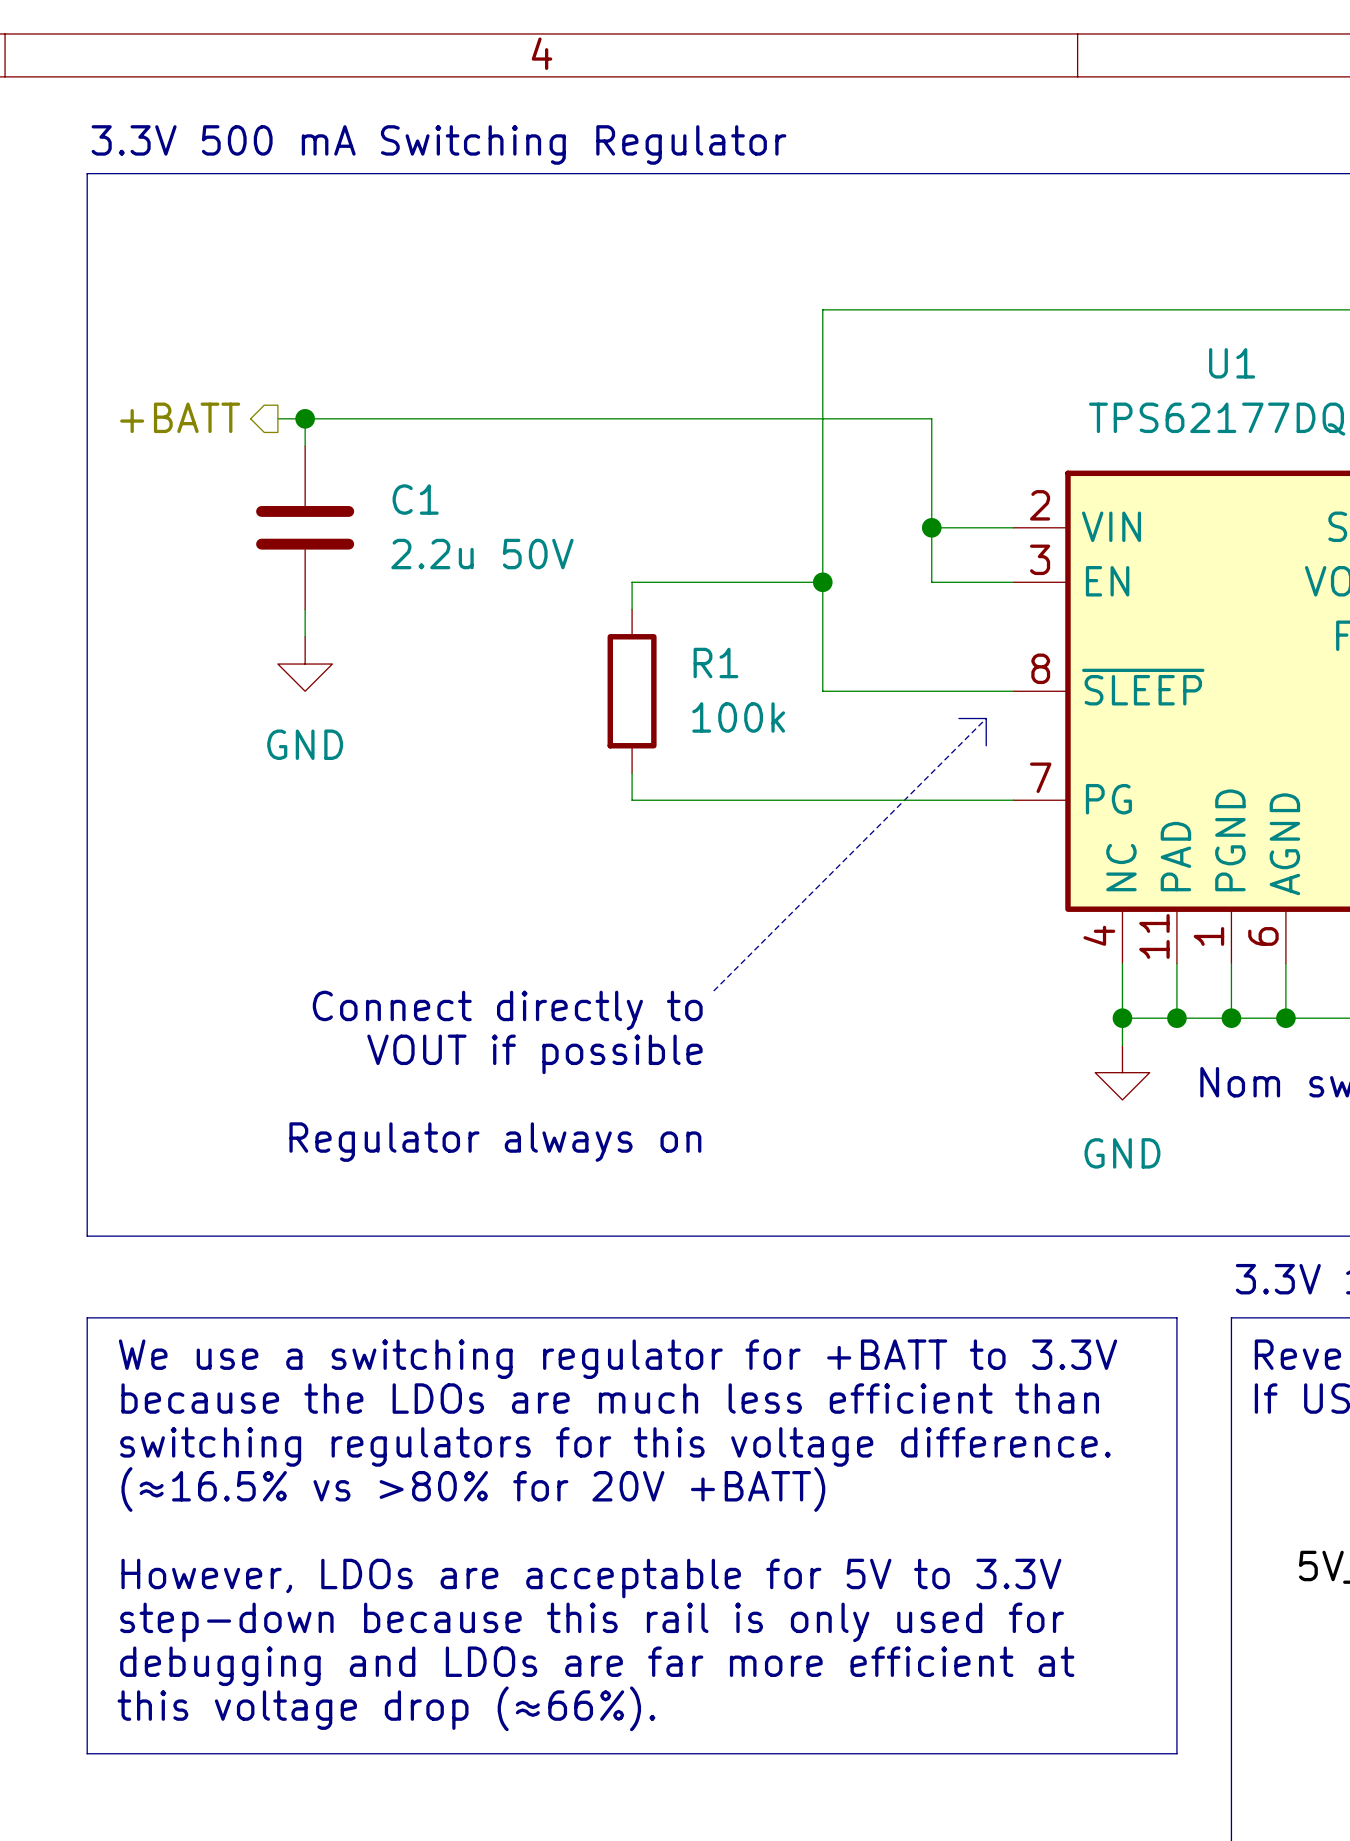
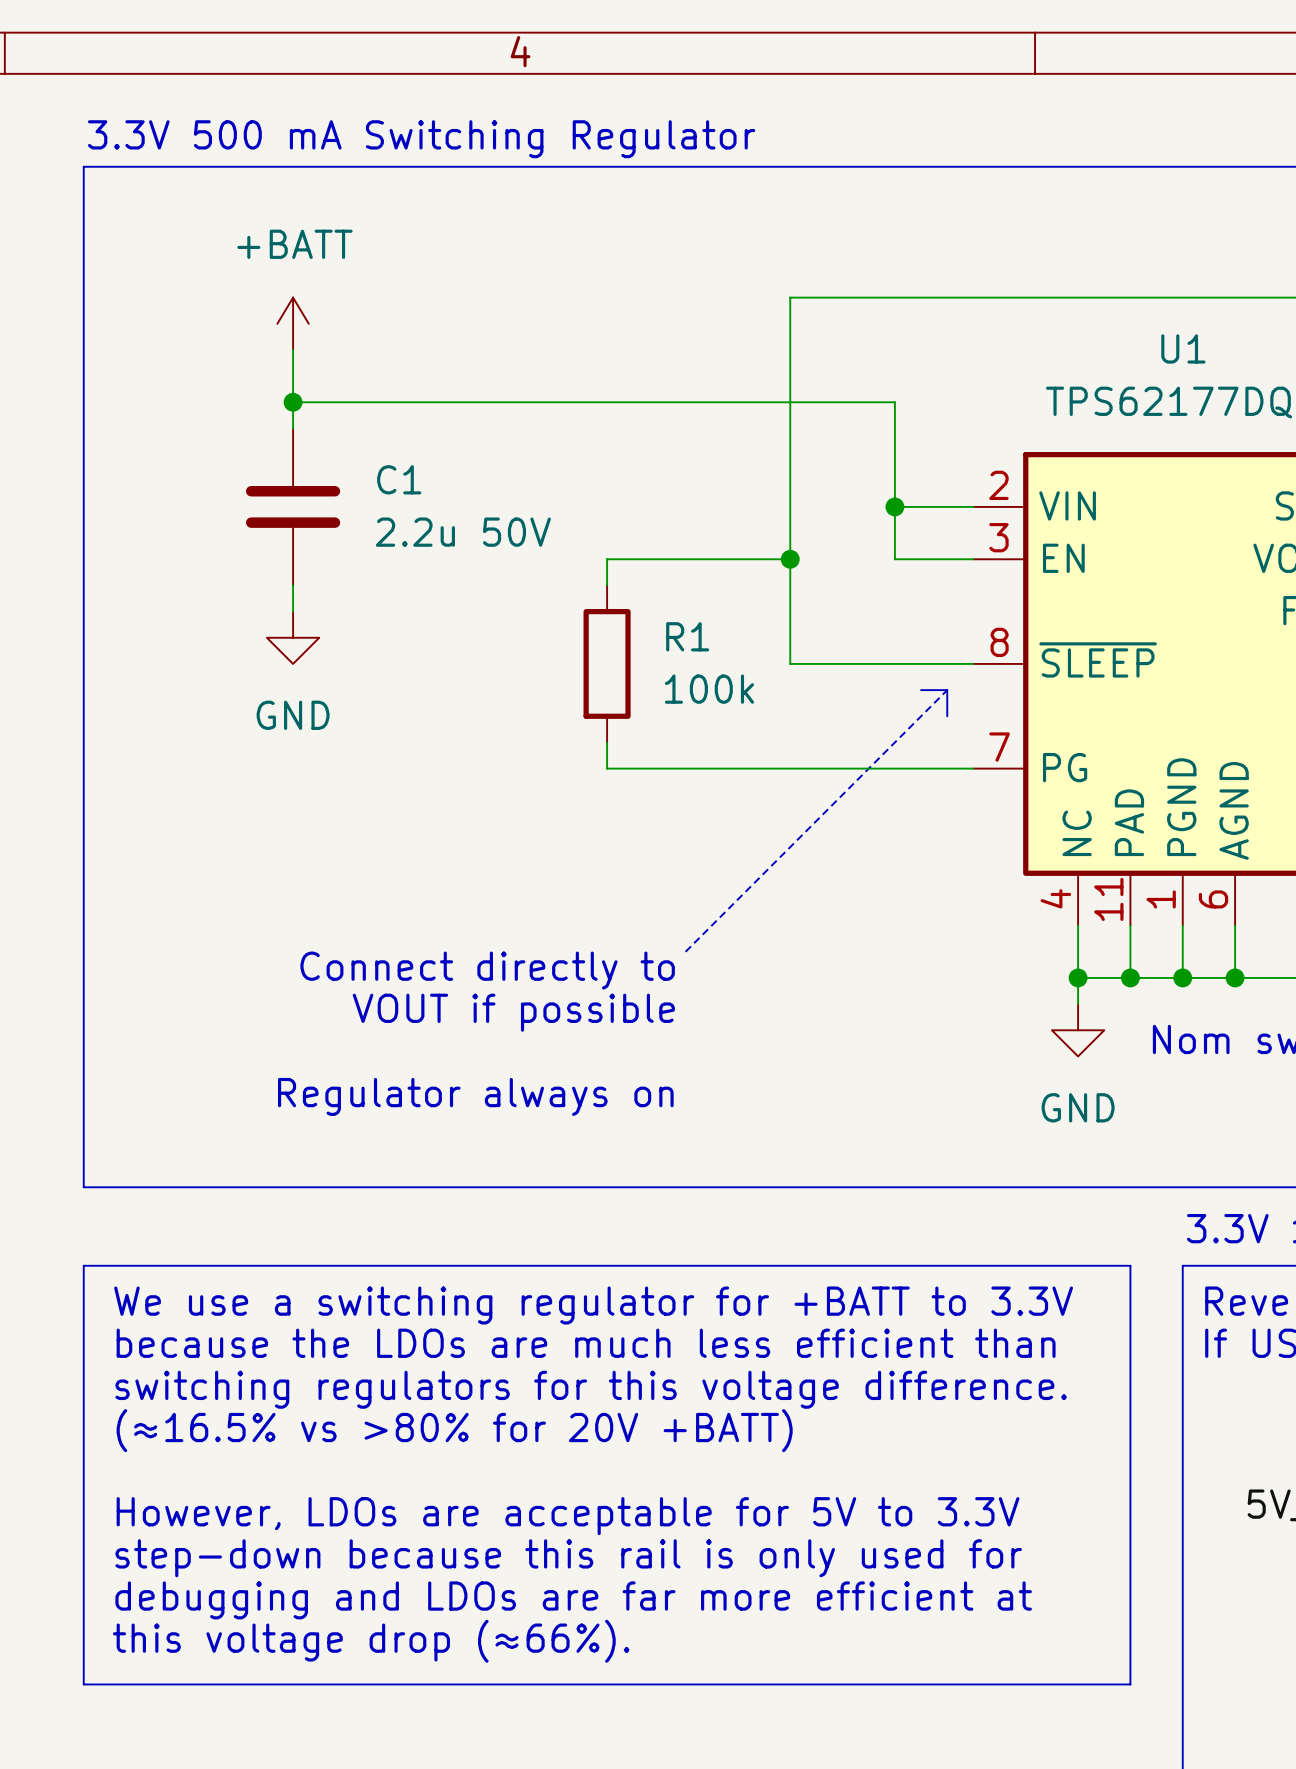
power symbol: none -> +BATT (293, 323)
hierarchical label: +BATT (180, 417) -> none
wire: (277, 418) (305, 418) -> (293, 349) (293, 402)

